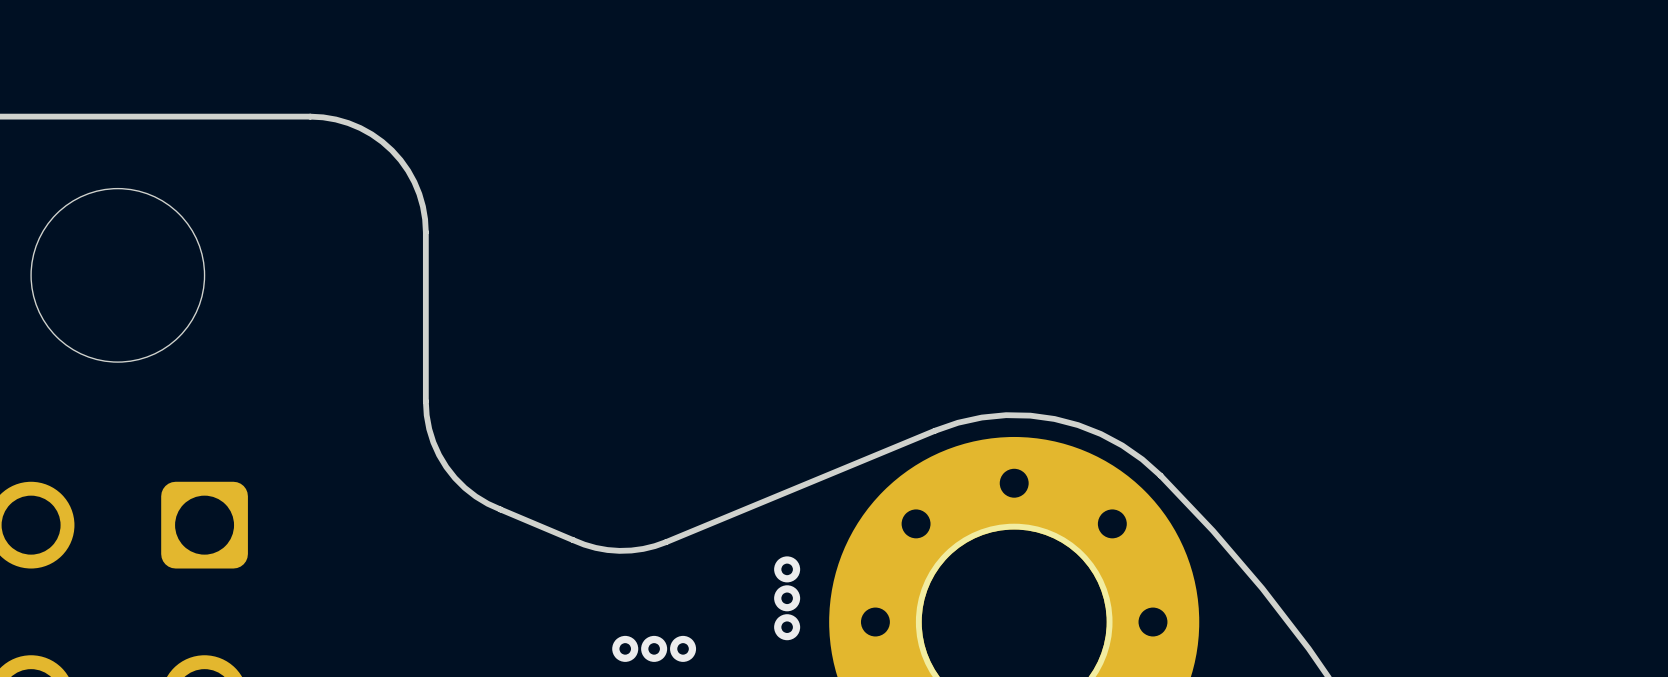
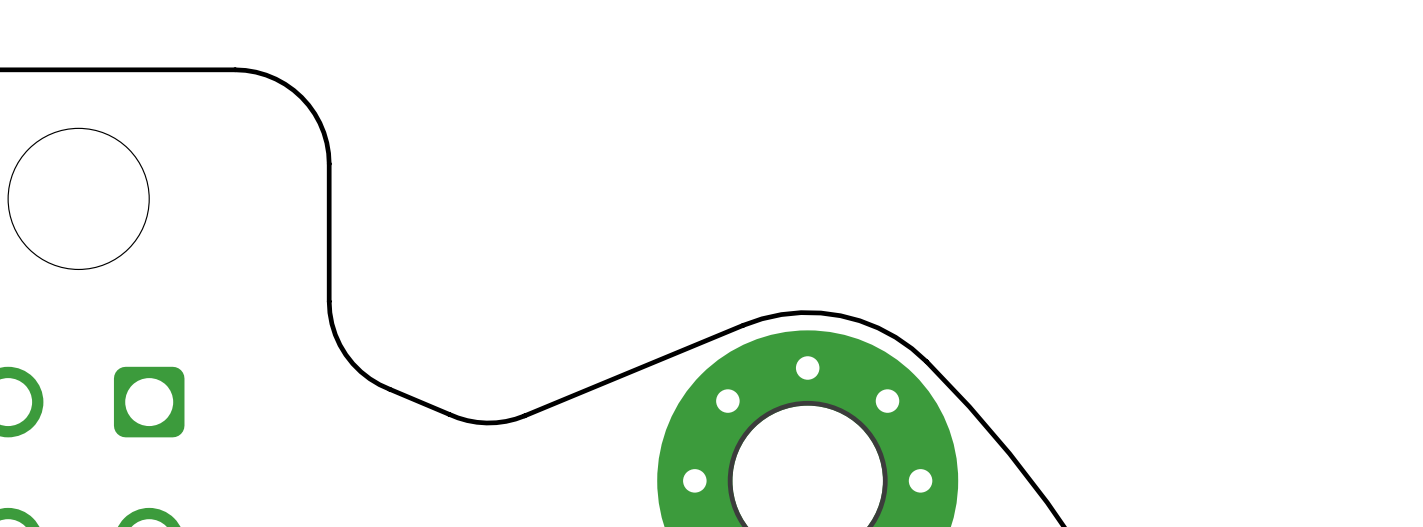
via: (787, 569) -> none
via: (787, 598) -> none
via: (787, 627) -> none
via: (625, 648) -> none
via: (654, 648) -> none
via: (683, 648) -> none

